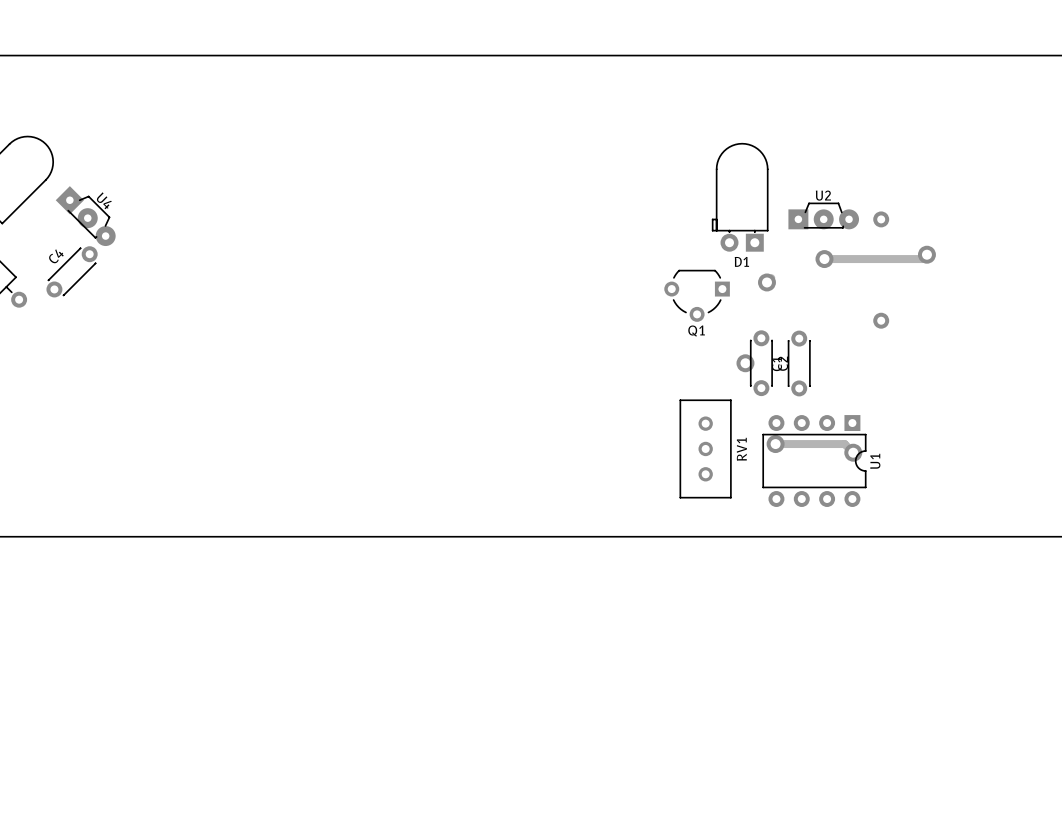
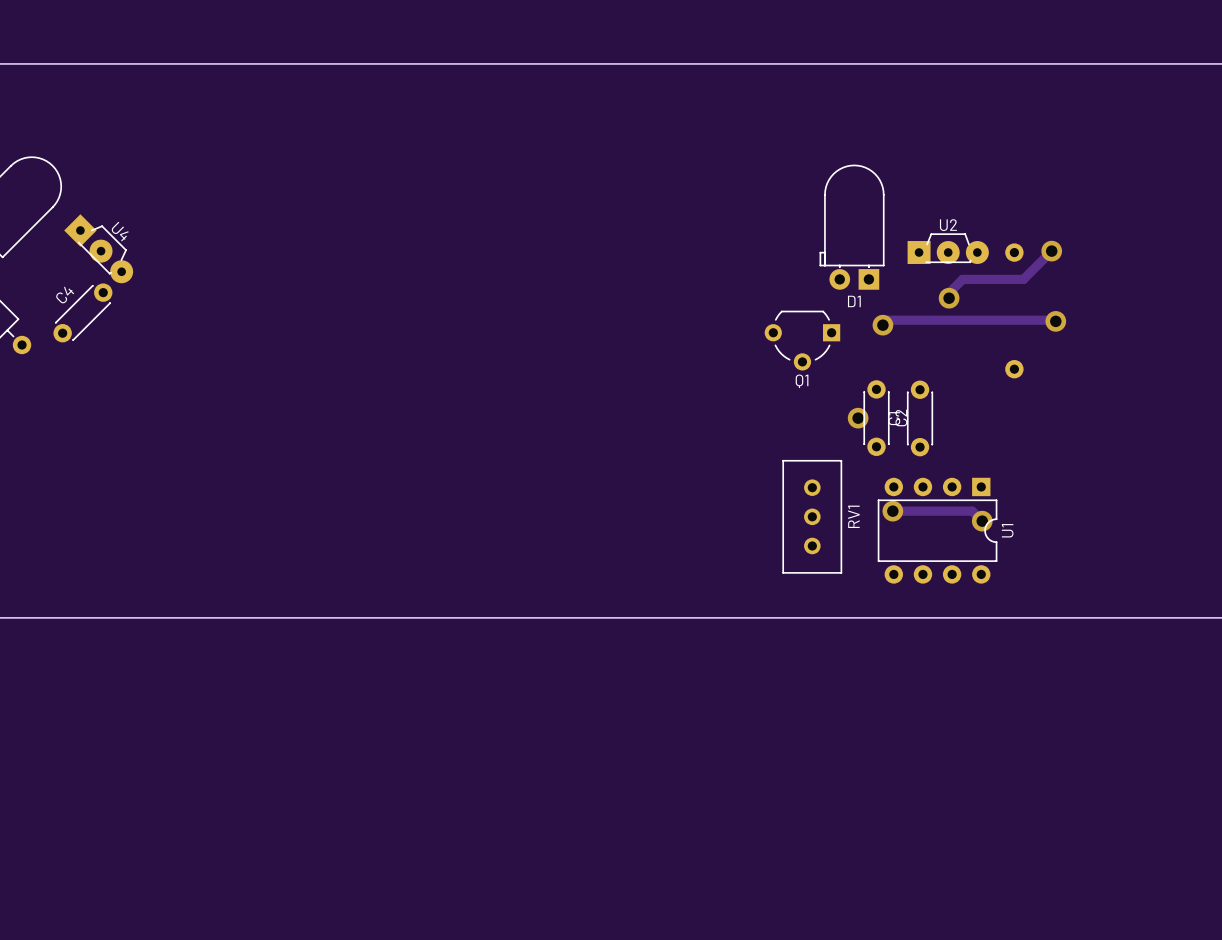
track: none -> (1051, 251) (1023, 279) (962, 279) (943, 298)
via: none -> (1051, 251)
track: (926, 254) (922, 259) (824, 259) -> none
via: (926, 254) -> none
track: none -> (887, 320) (1055, 321)
via: none -> (1055, 321)

